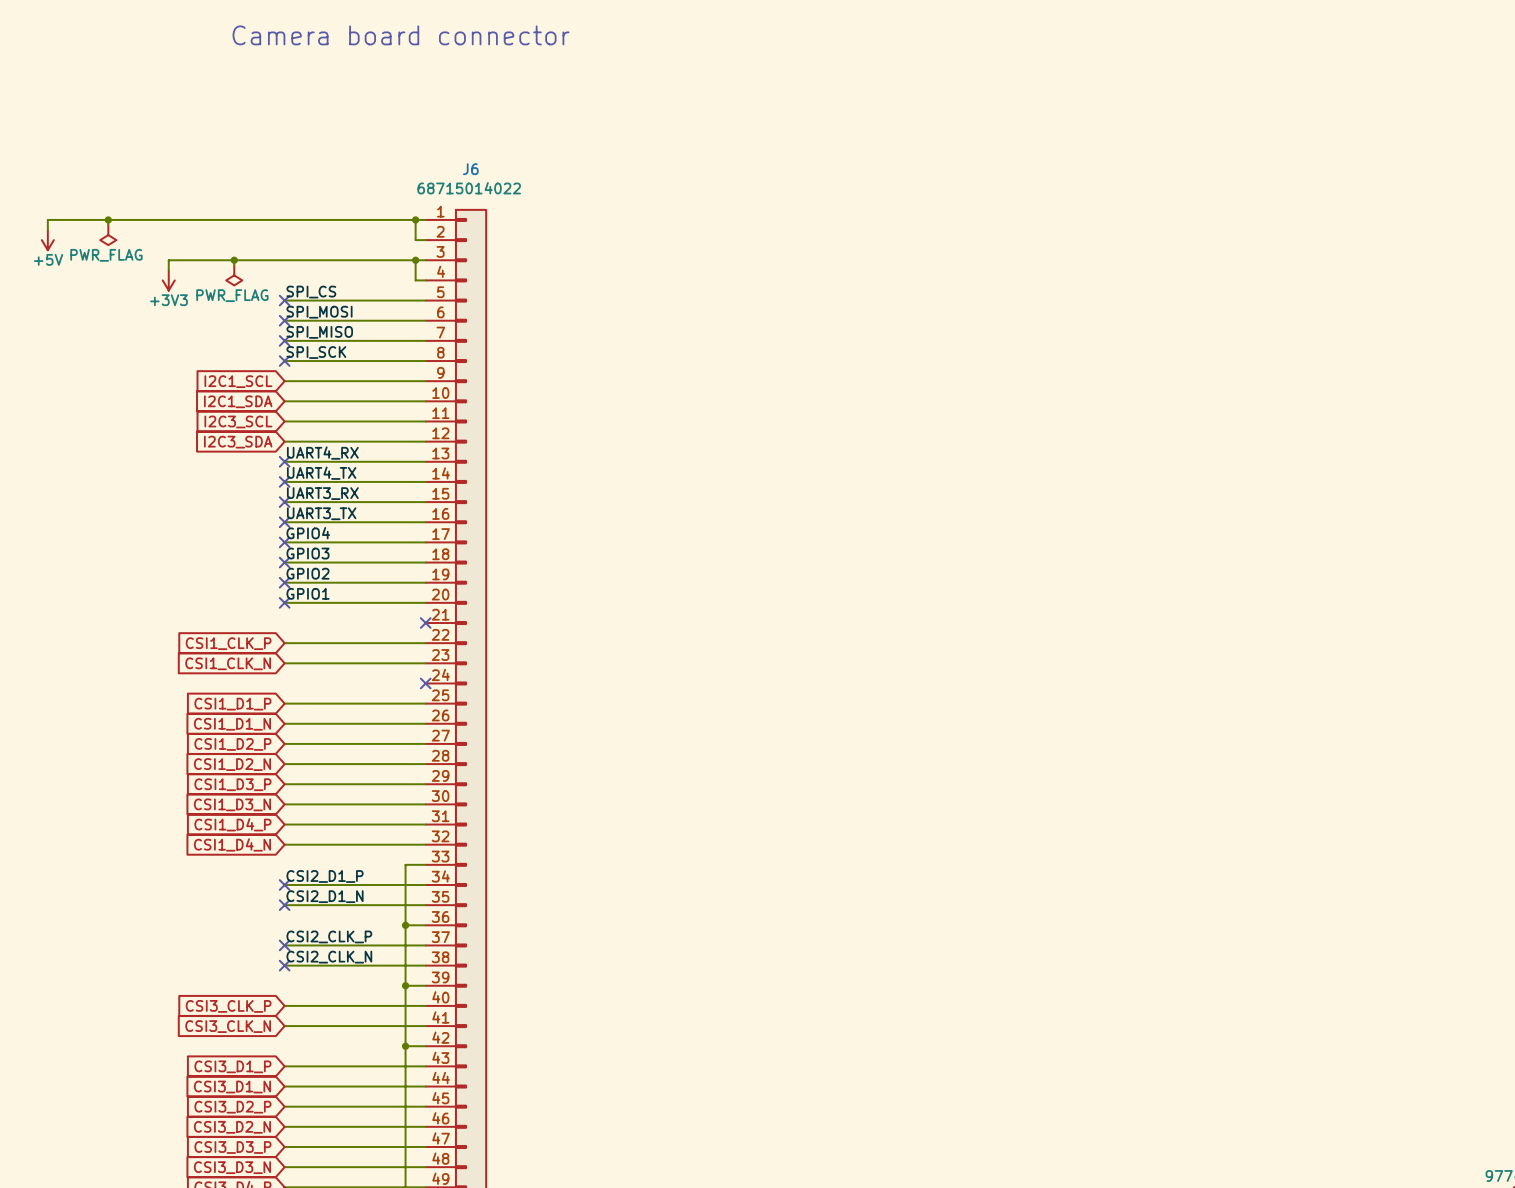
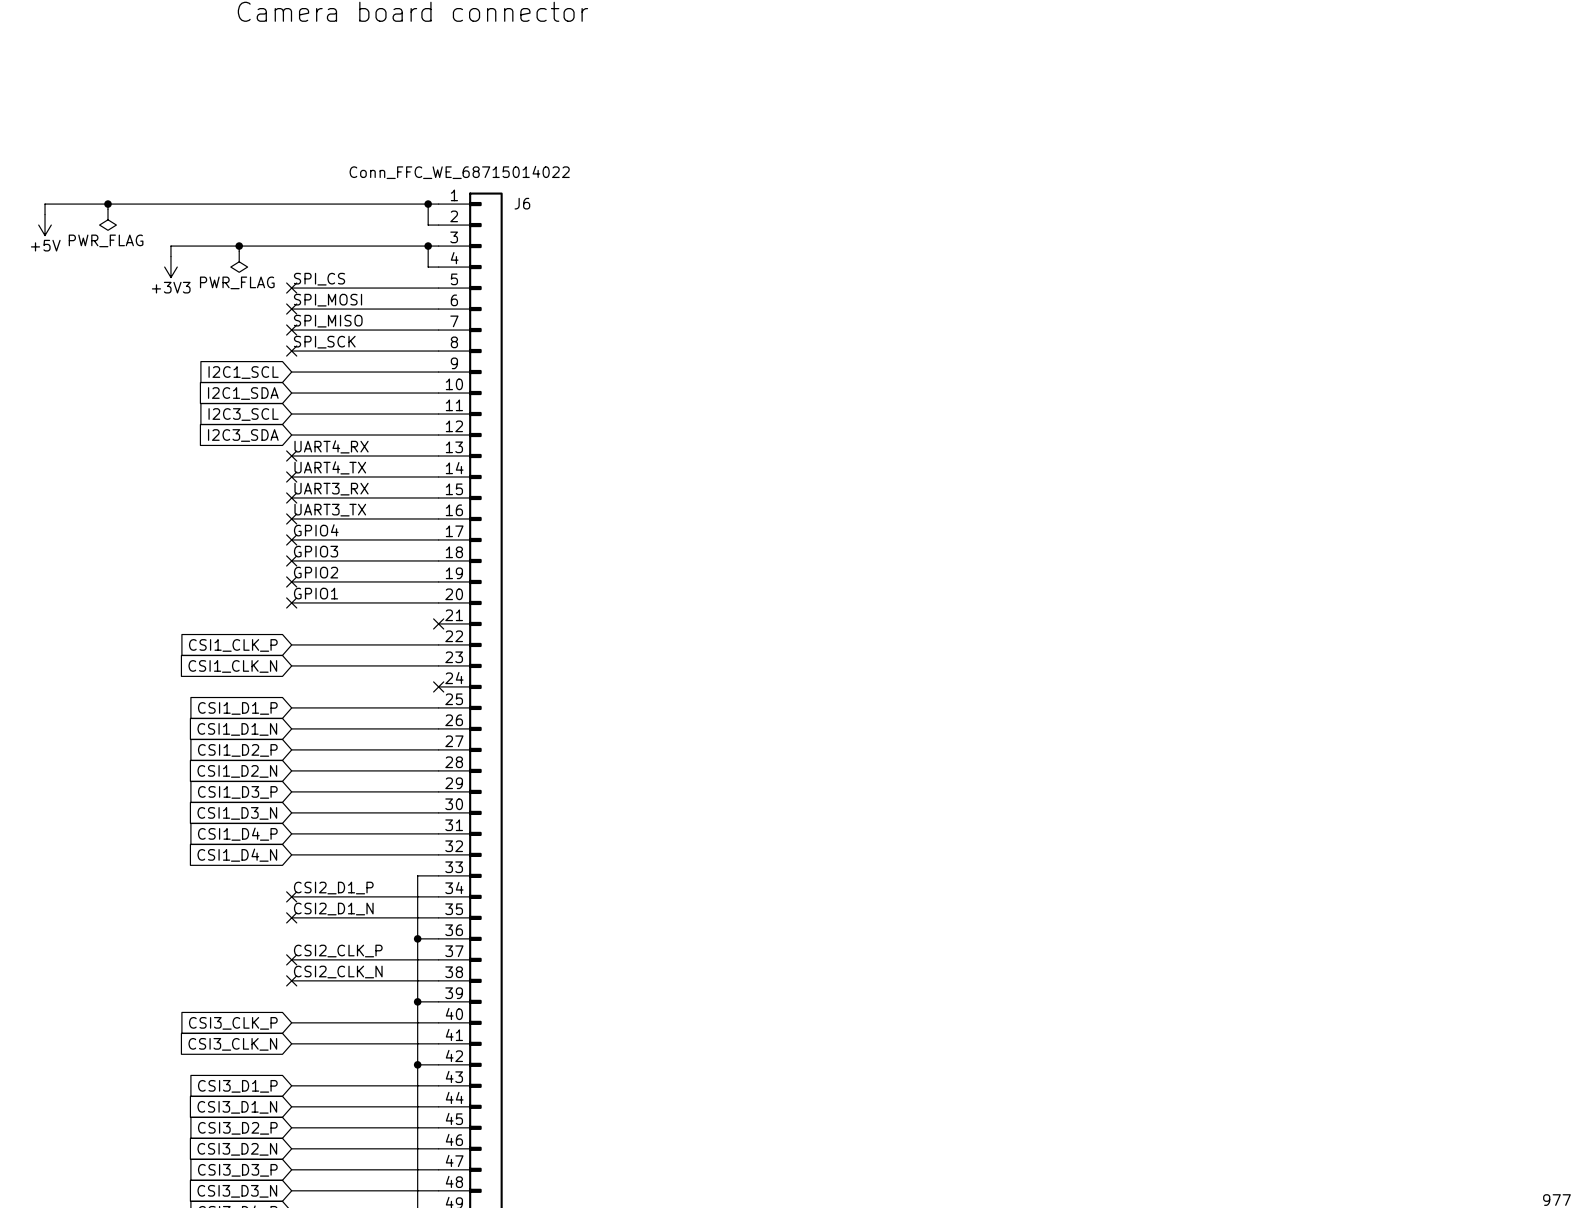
J6 name position: J6 (470, 169) -> J6 (522, 203)
J6 text: 68715014022 (469, 188) -> none
J6 value: none -> Conn_FFC_WE_68715014022 (459, 172)

